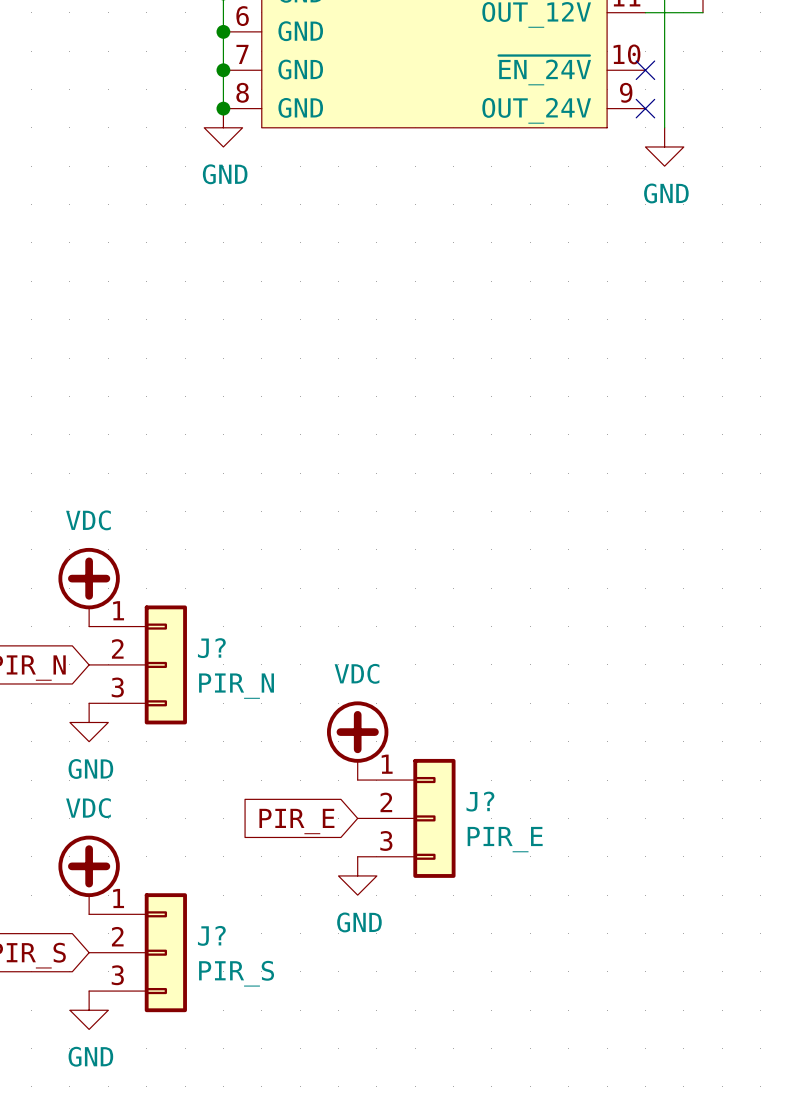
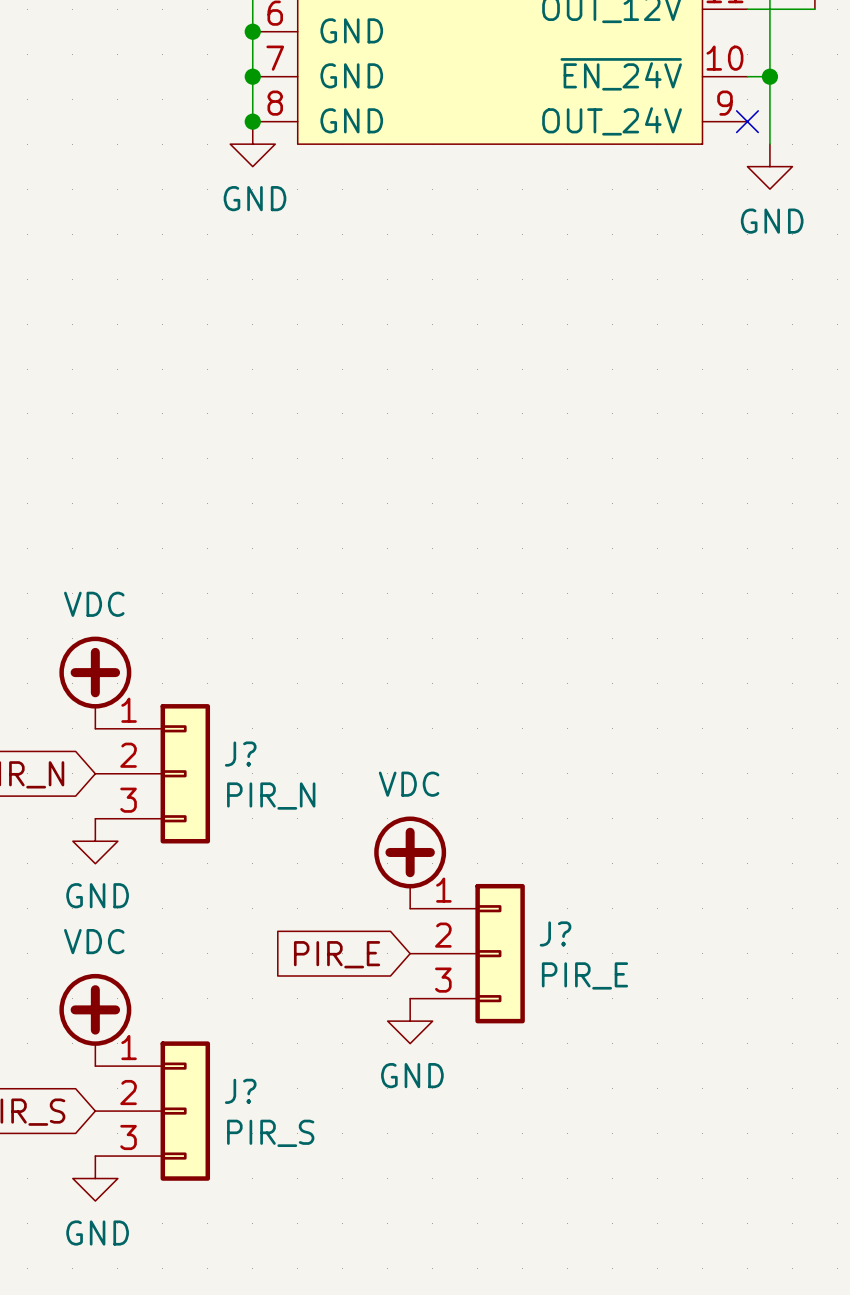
wire: none -> (747, 76) (769, 76)
no-connect mark: (645, 70) -> none
junction: none -> (769, 76)

